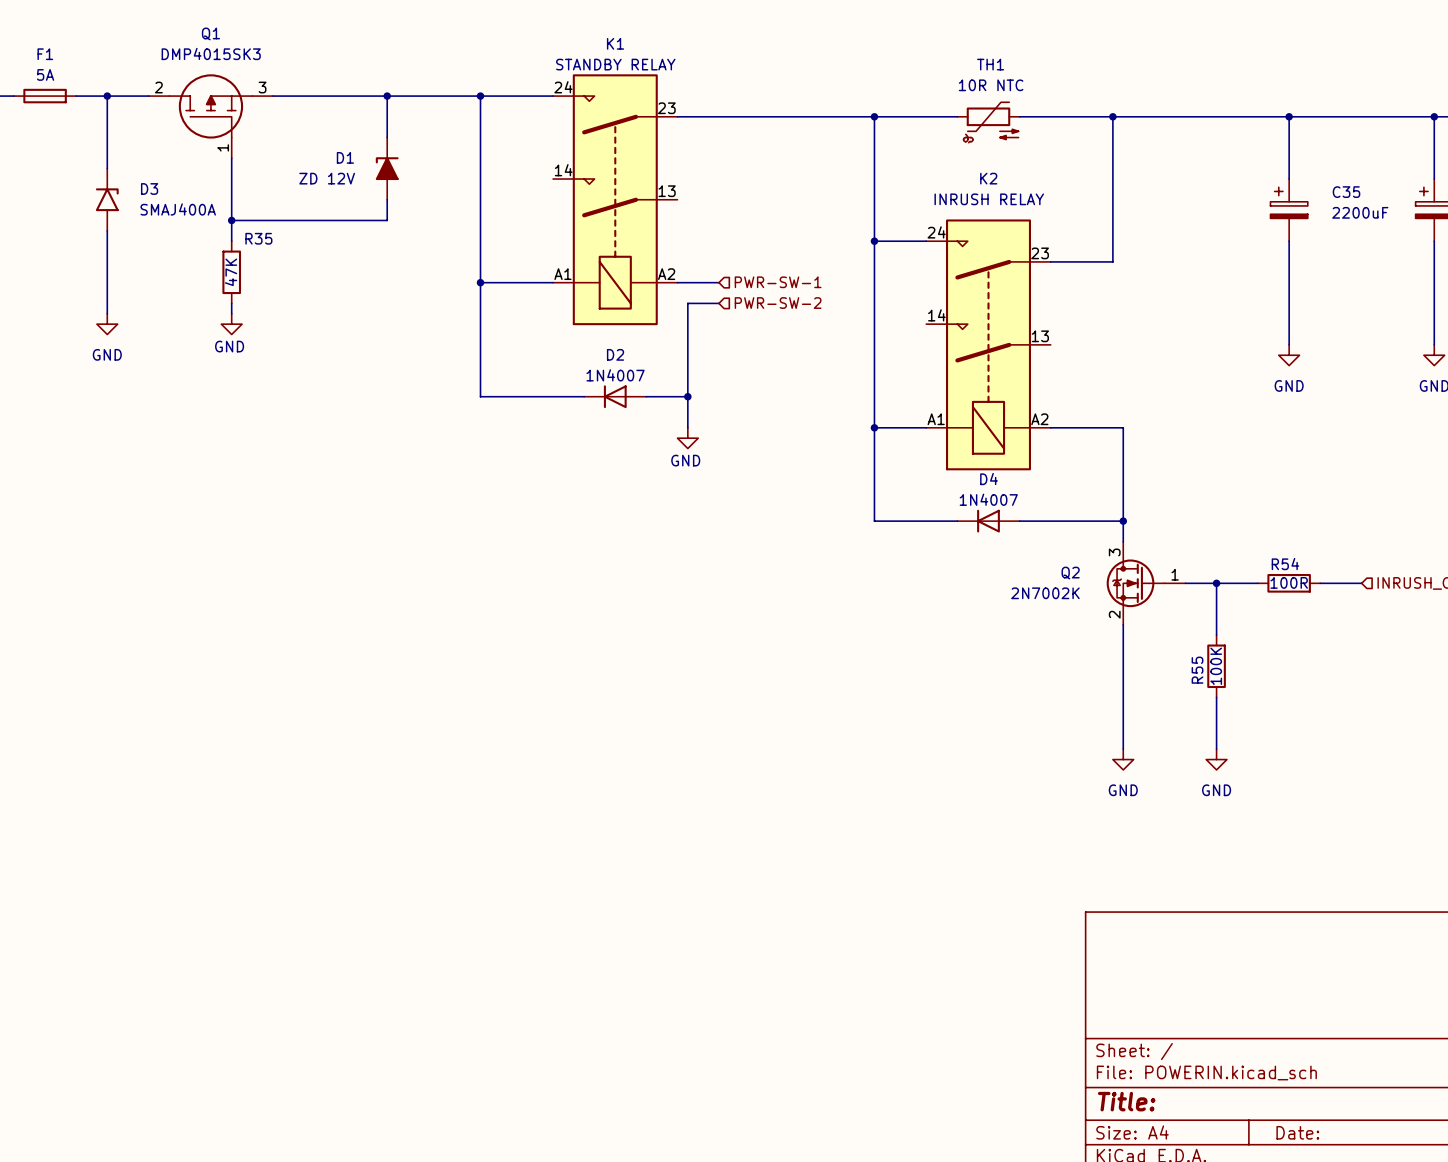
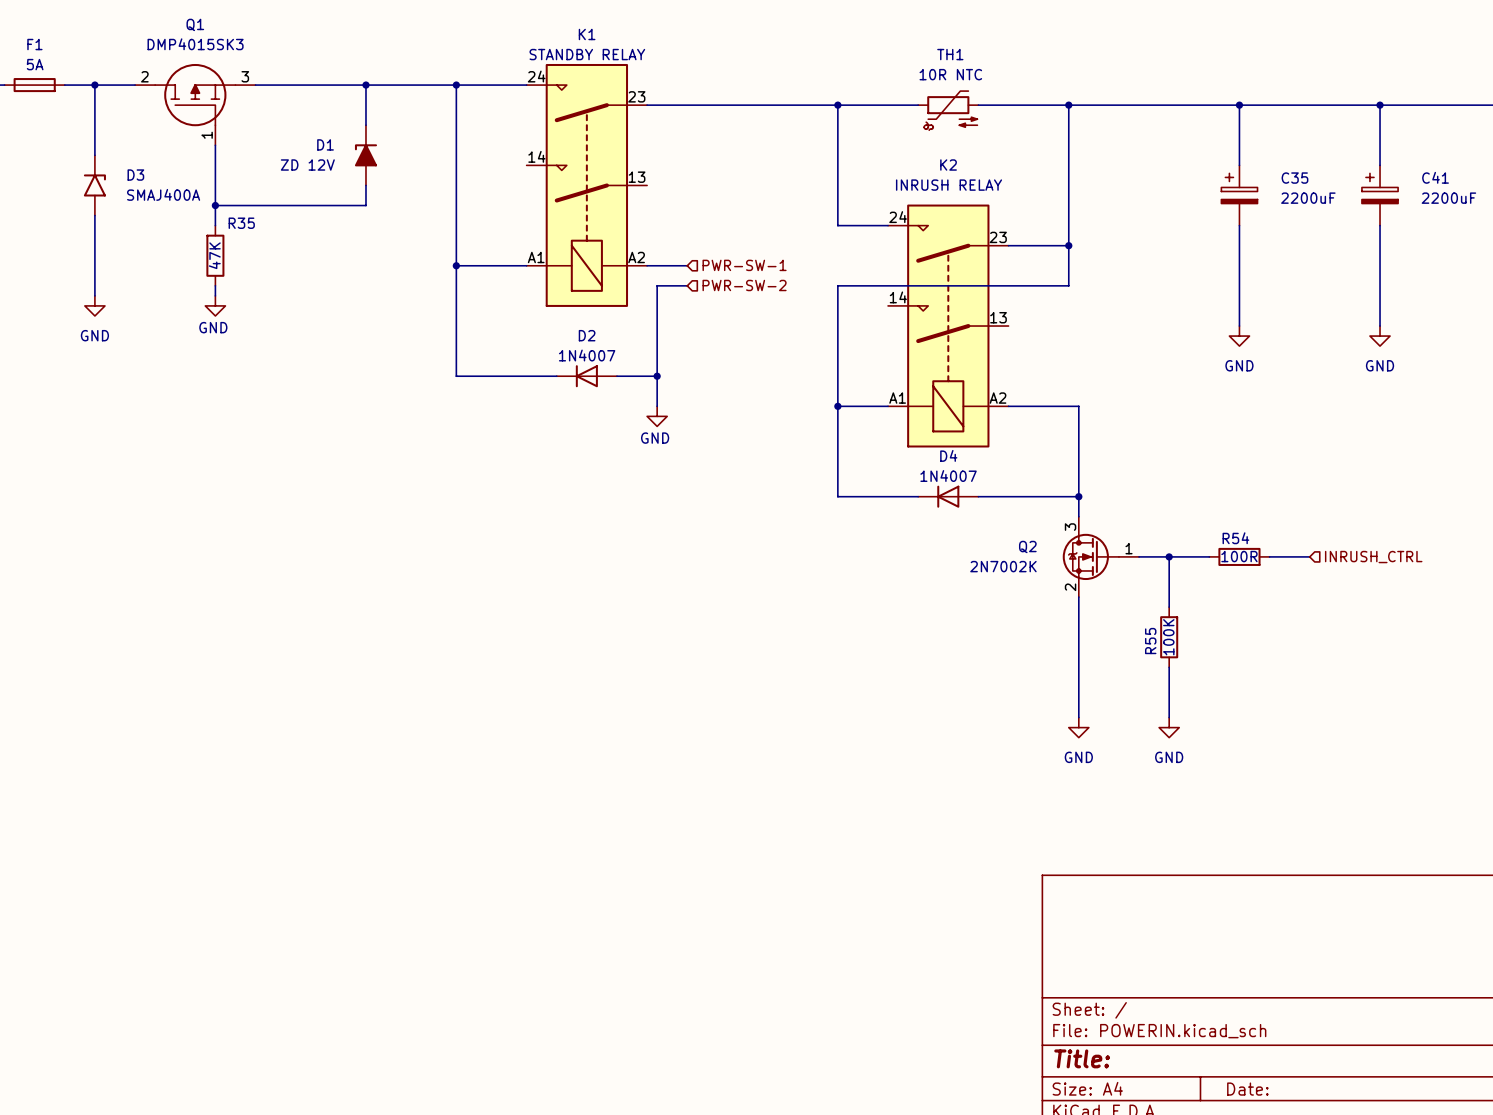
wire: (874, 241) (874, 303) -> (1068, 245) (1068, 285) (837, 285)
junction: (874, 241) -> none
junction: none -> (1068, 245)

